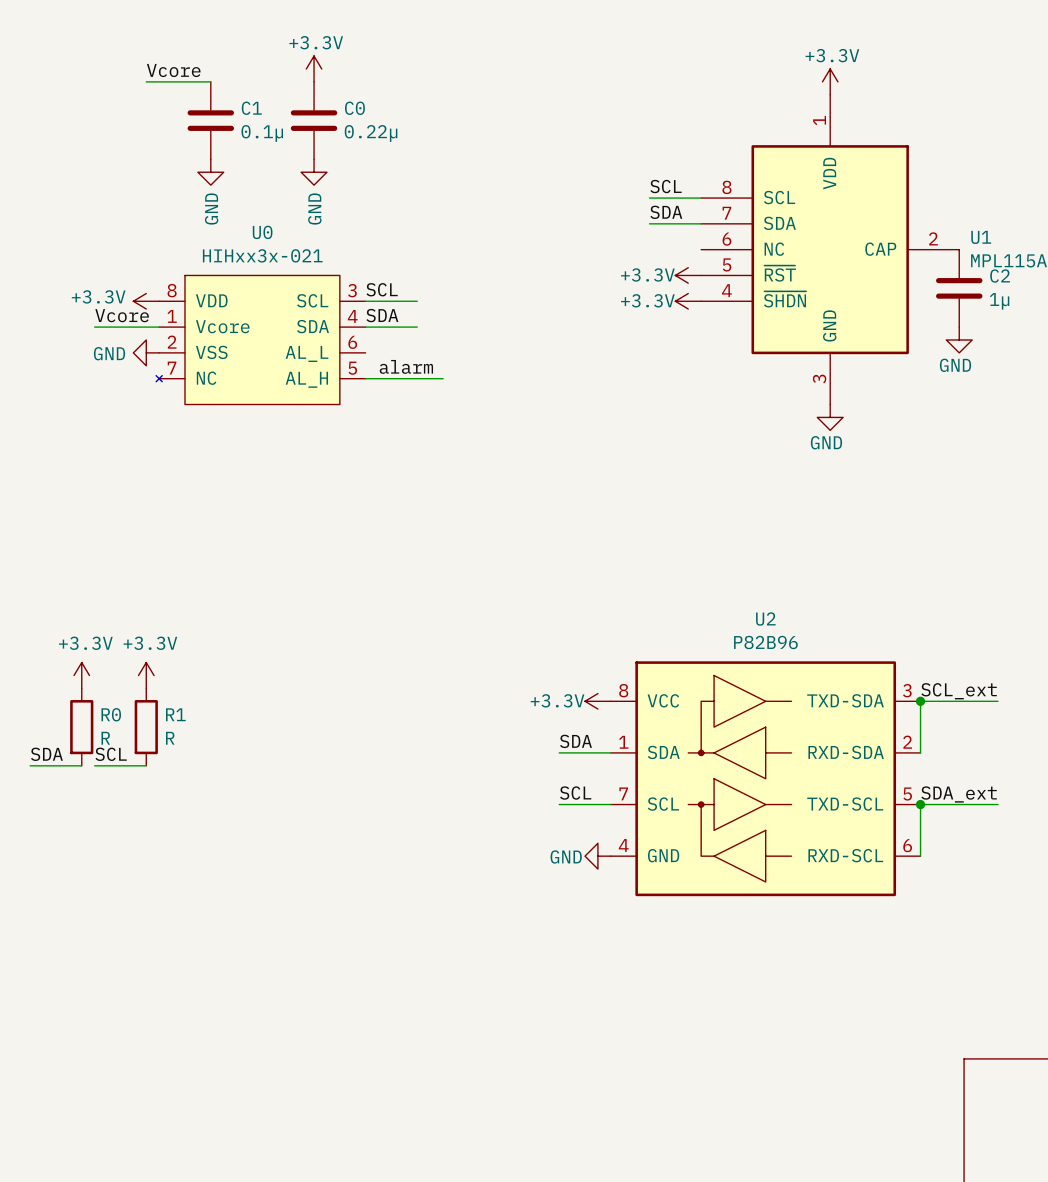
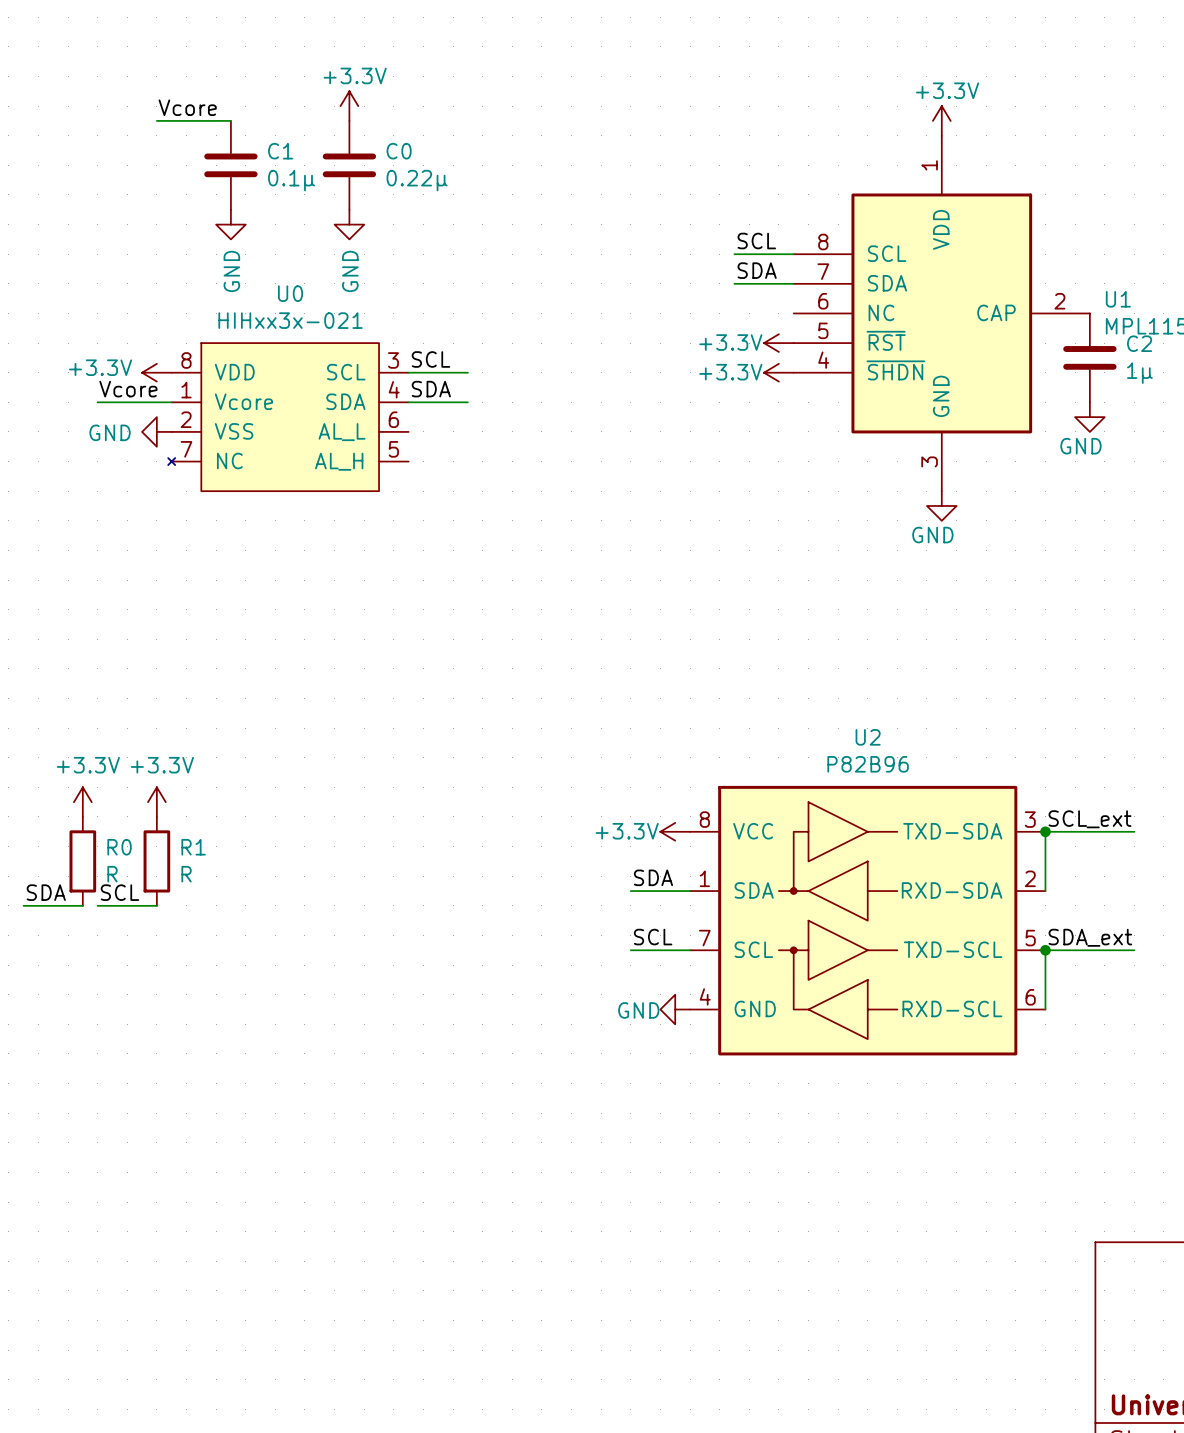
label: alarm (406, 366) -> none
wire: (365, 378) (443, 378) -> none

